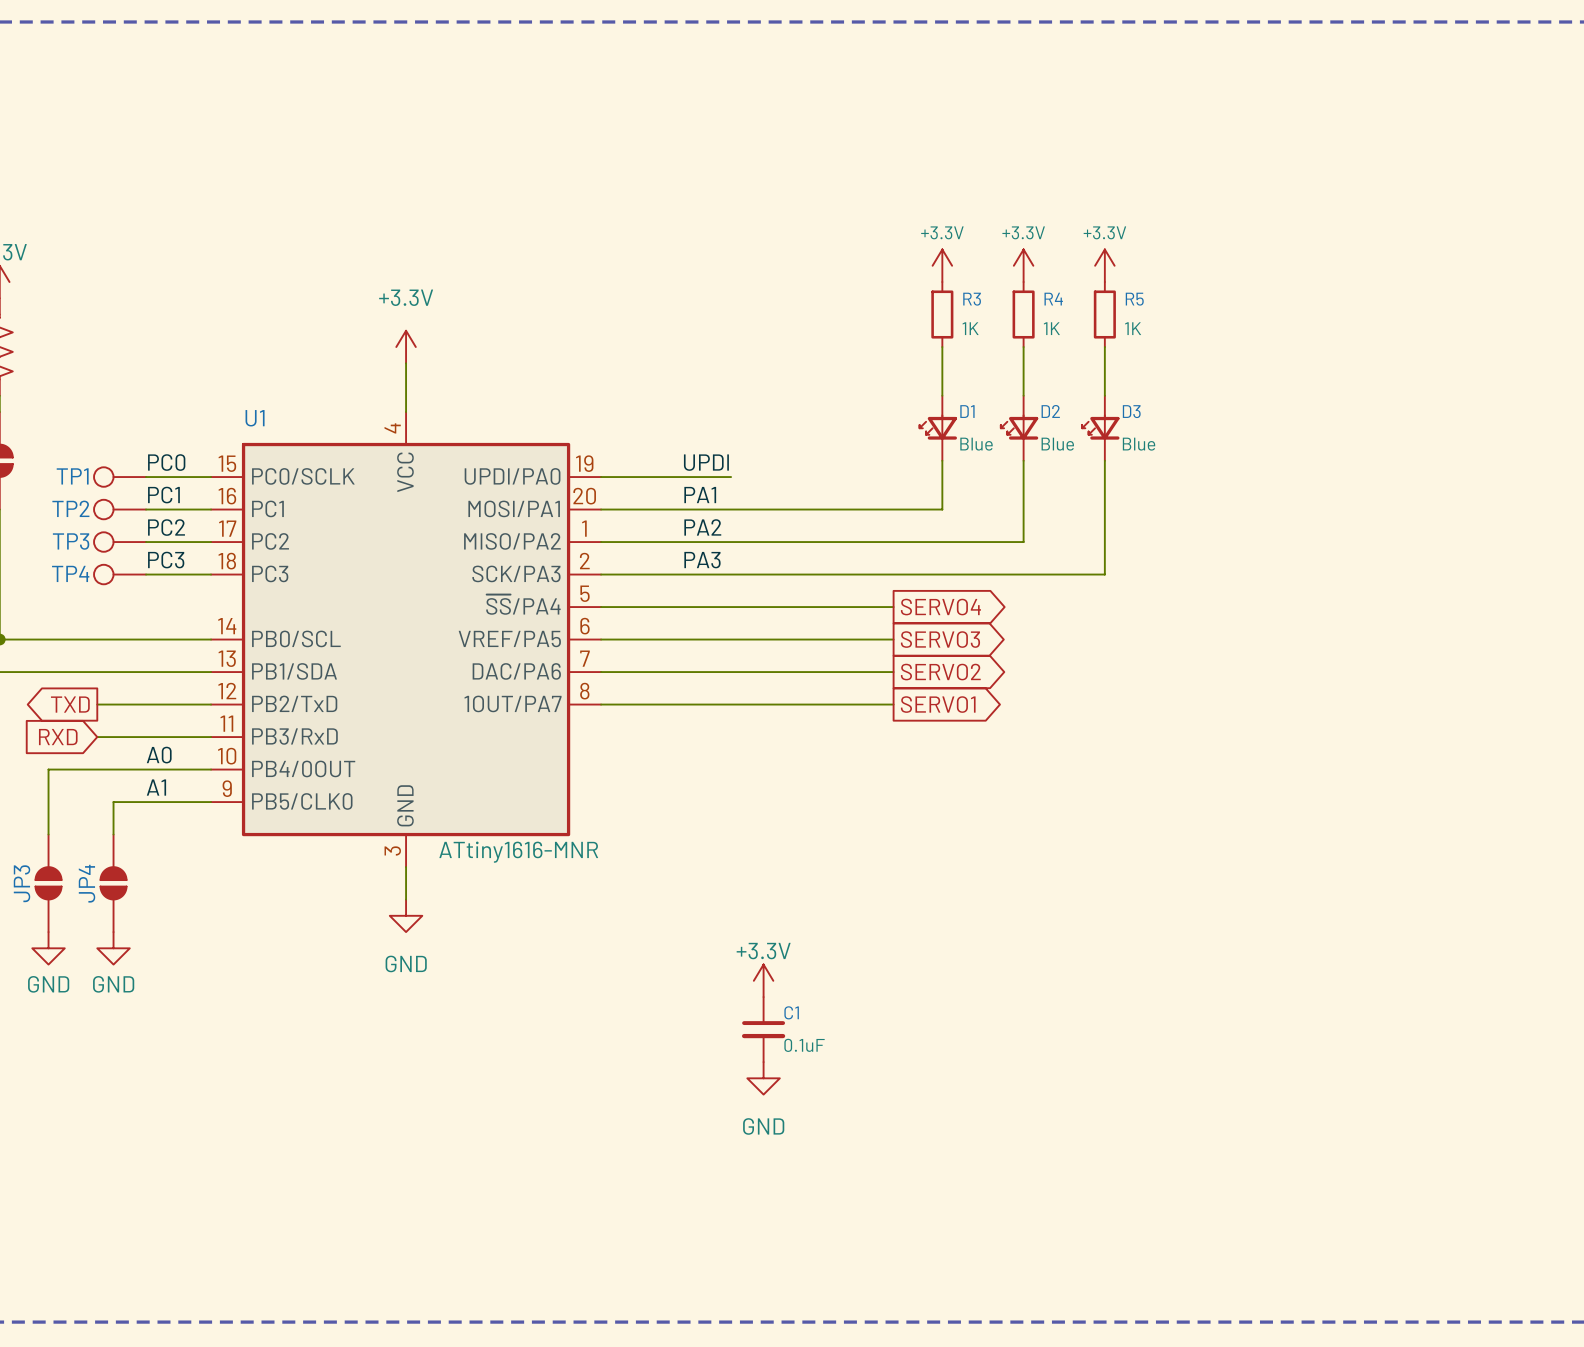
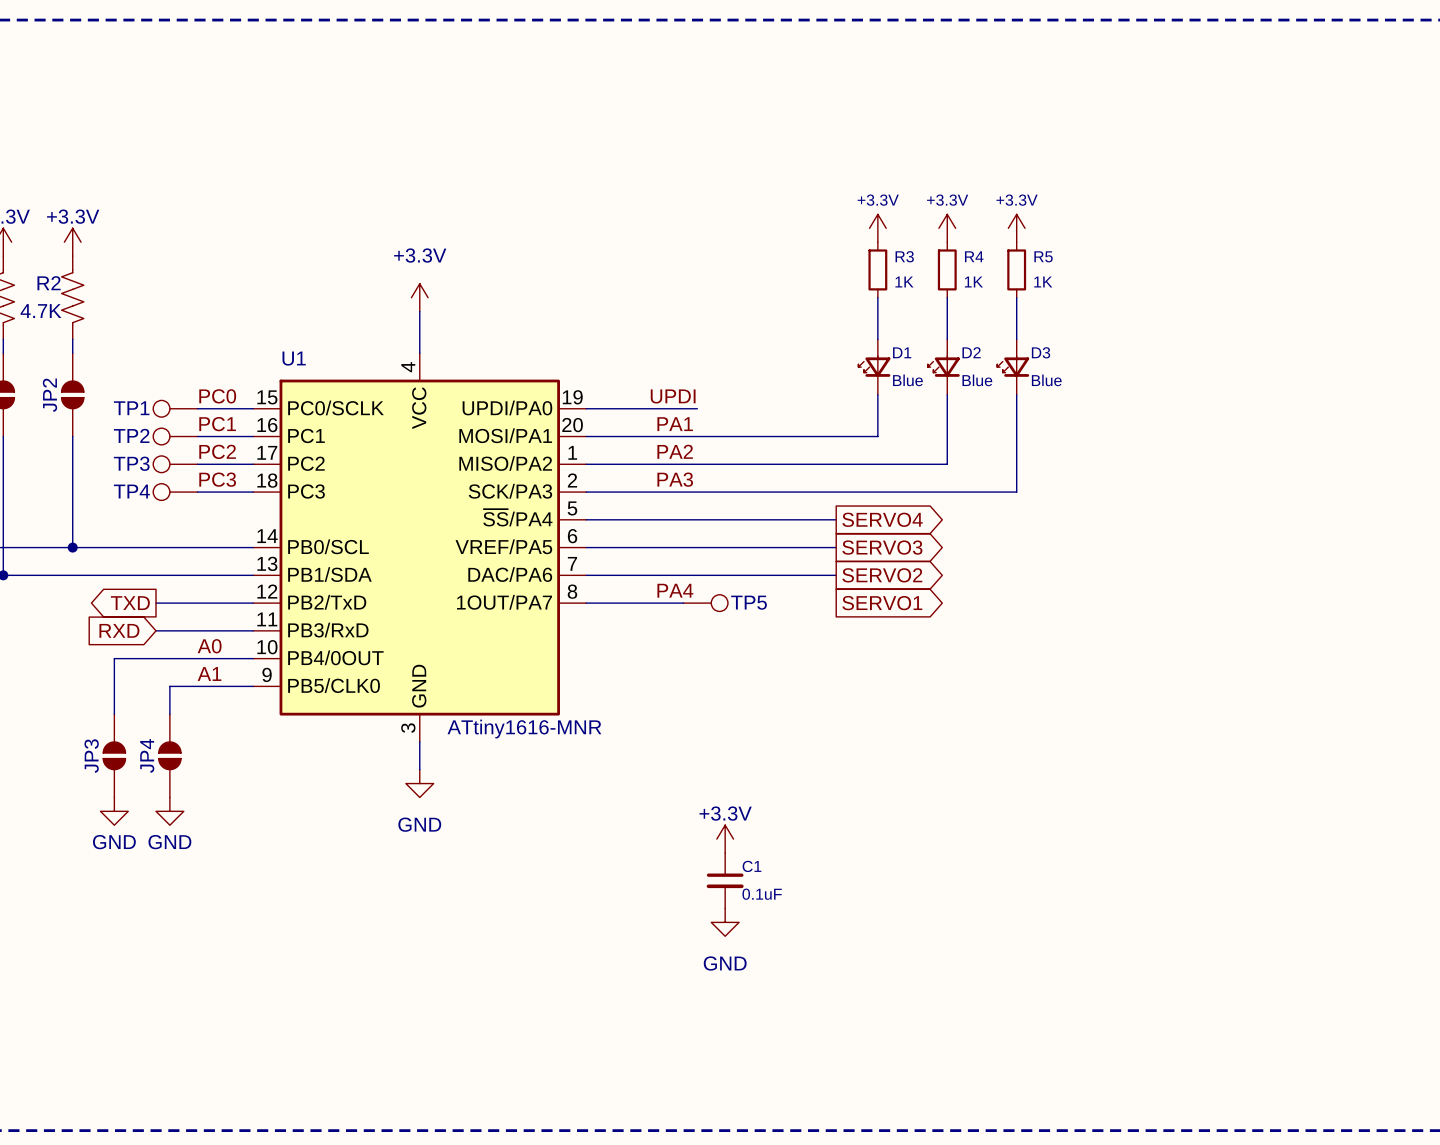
label: none -> PA4 (675, 590)
wire: (714, 704) (893, 704) -> none
TP5: none -> (705, 603)

